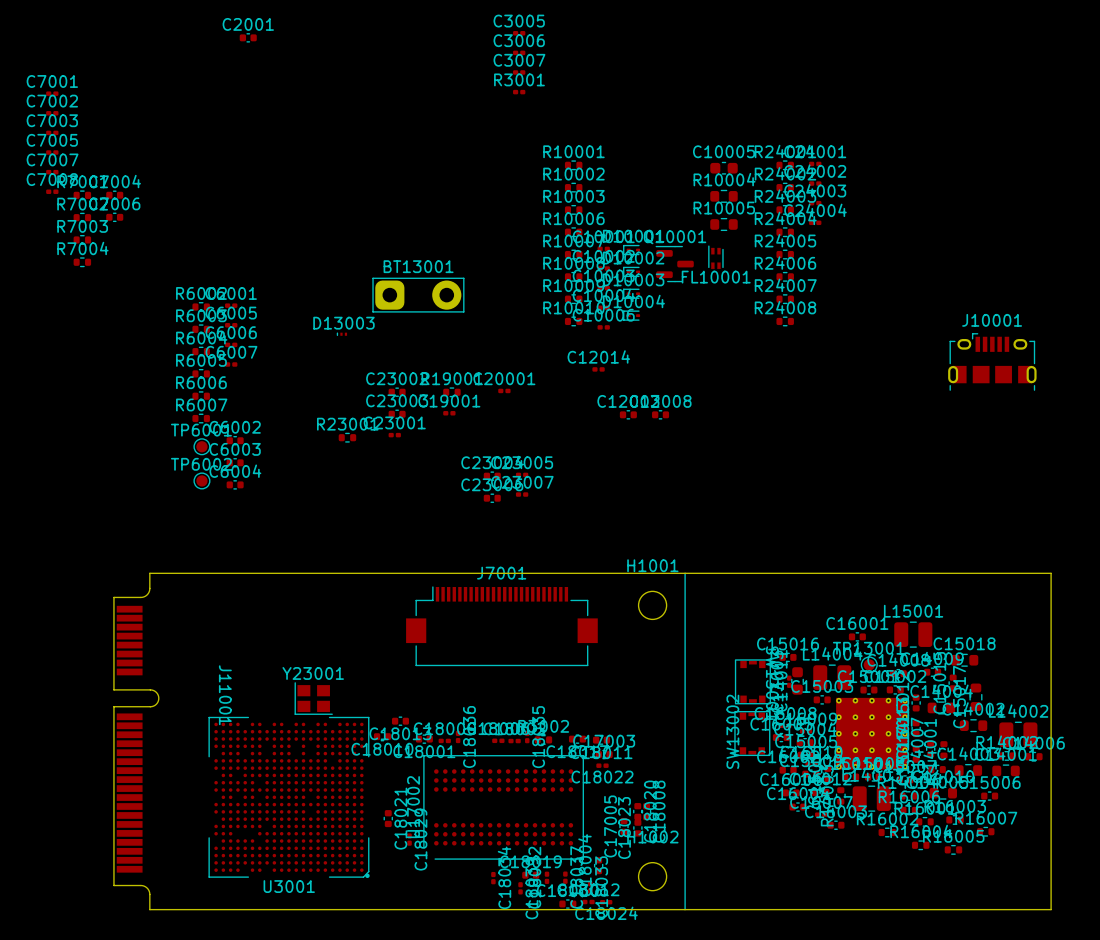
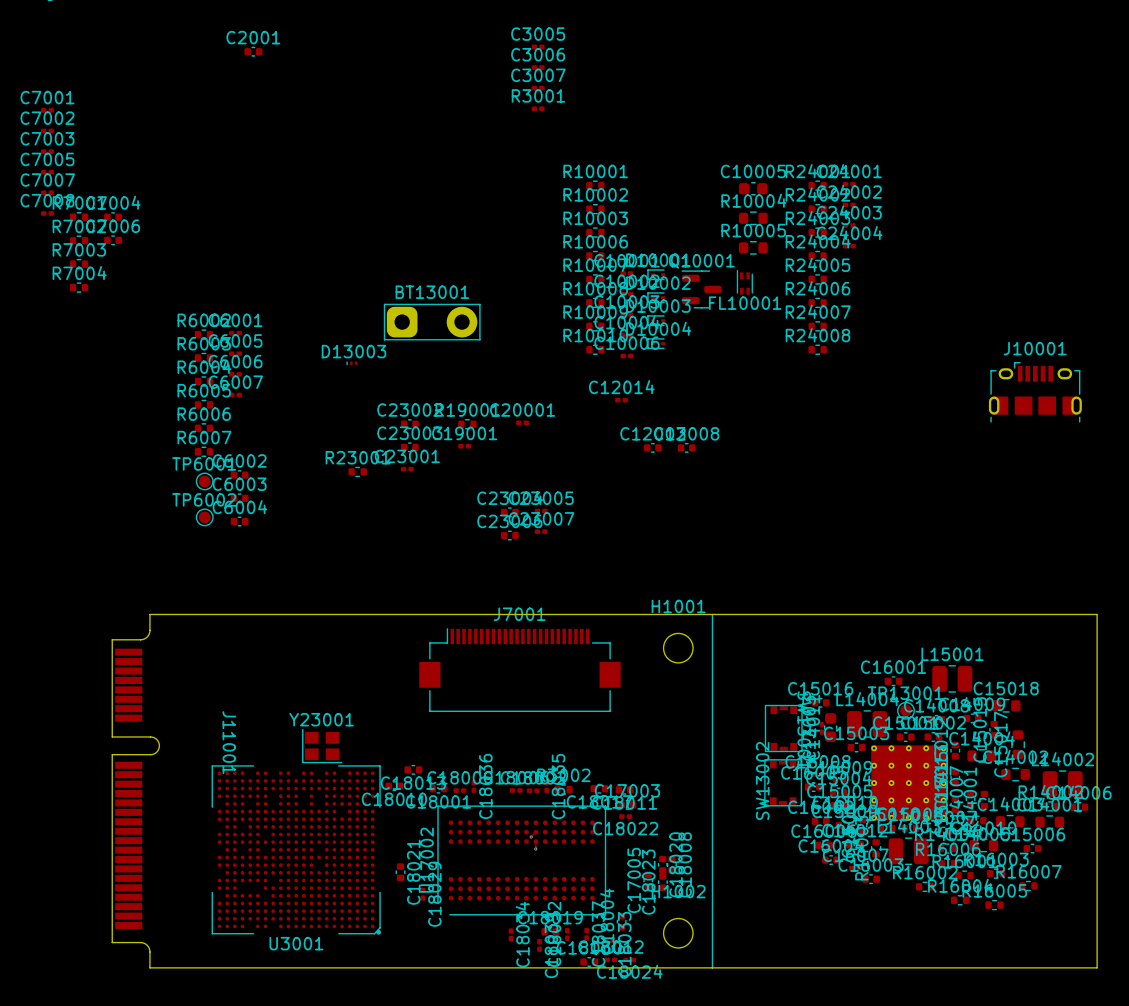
track: none -> (535, 832) (531, 837)
via: none -> (531, 837)
track: none -> (535, 841) (535, 848)
via: none -> (535, 849)

